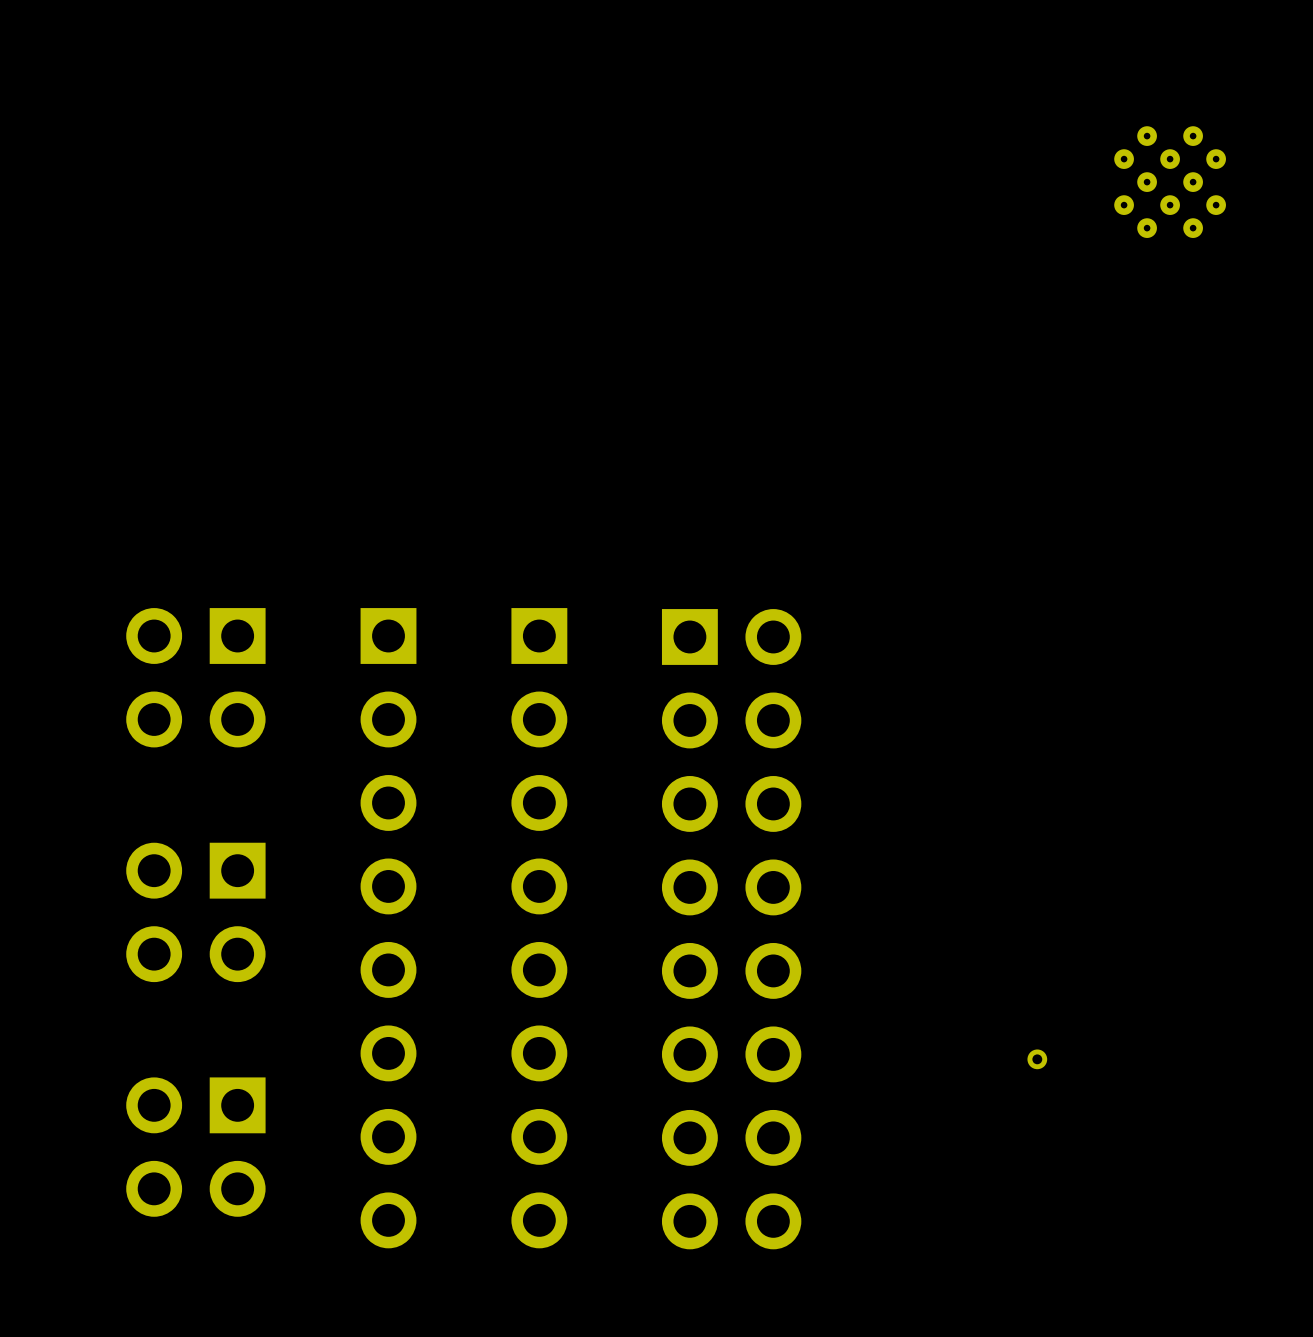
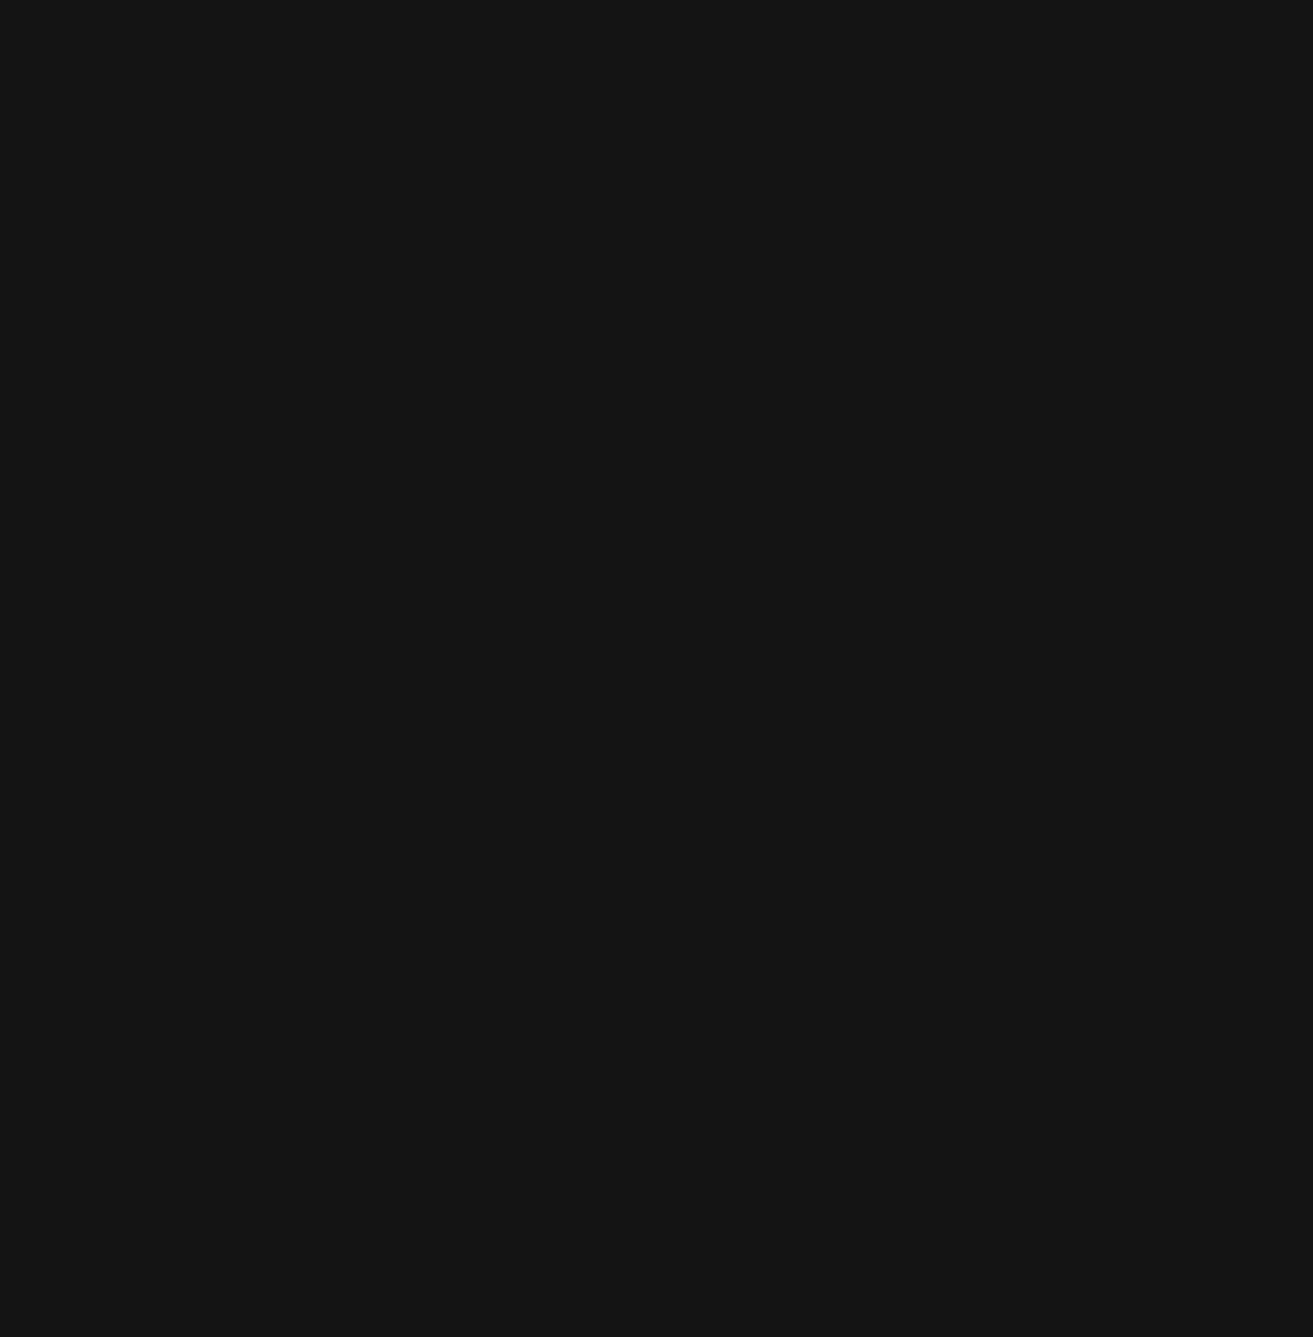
part: (1170, 182) -> none
part: (195, 677) -> none
part: (195, 912) -> none
part: (388, 928) -> none
part: (539, 928) -> none
part: (731, 929) -> none
part: (1037, 1059) -> none
part: (195, 1147) -> none

